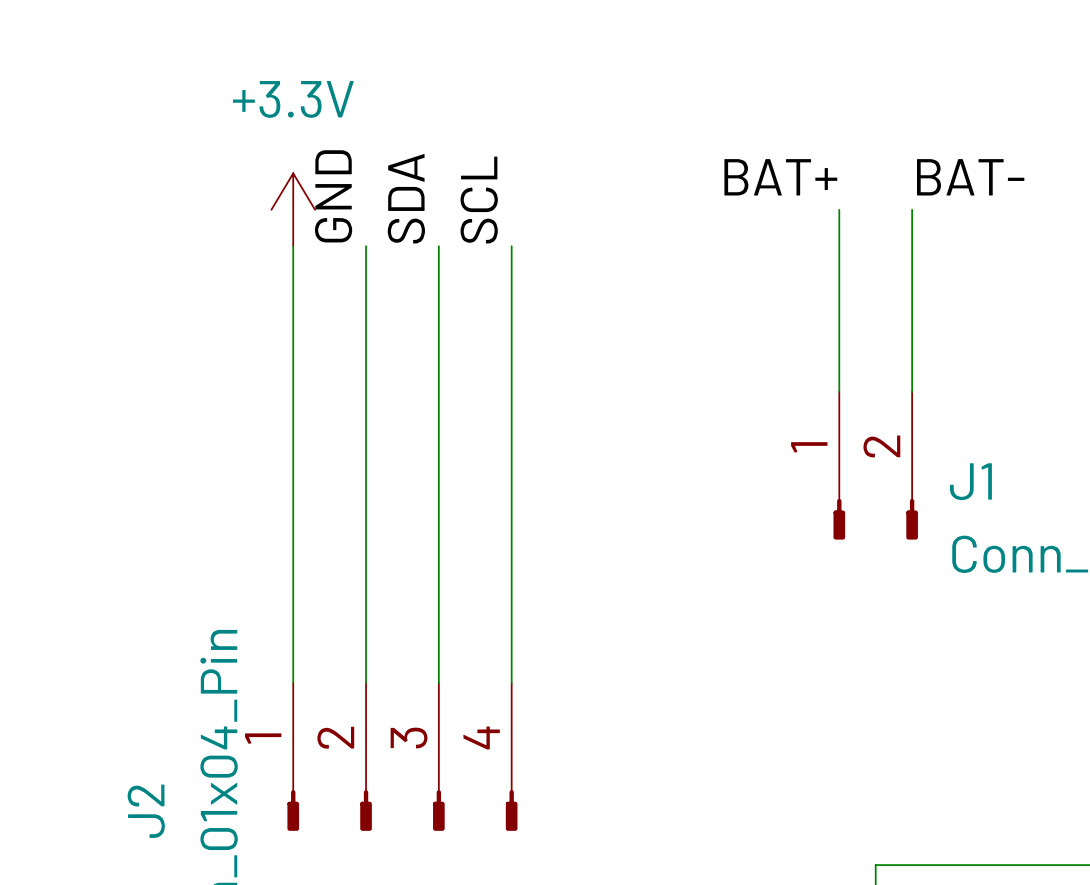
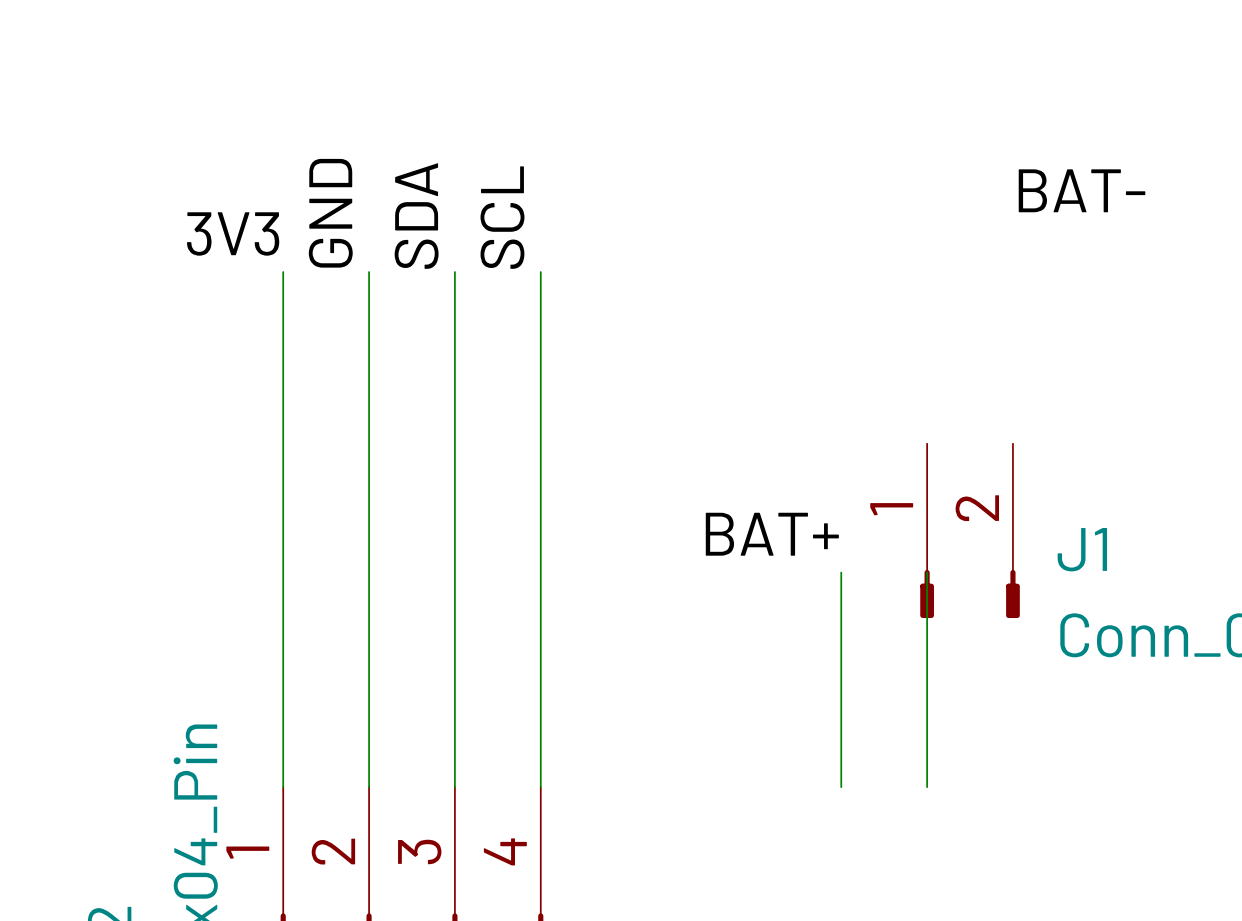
label position: BAT+ (780, 177) -> BAT+ (772, 534)
power symbol: +3.3V (293, 209) -> none
wire: (839, 209) (839, 391) -> (841, 572) (841, 787)
wire: (912, 209) (912, 391) -> (927, 572) (927, 787)
label: none -> 3V3 (233, 233)

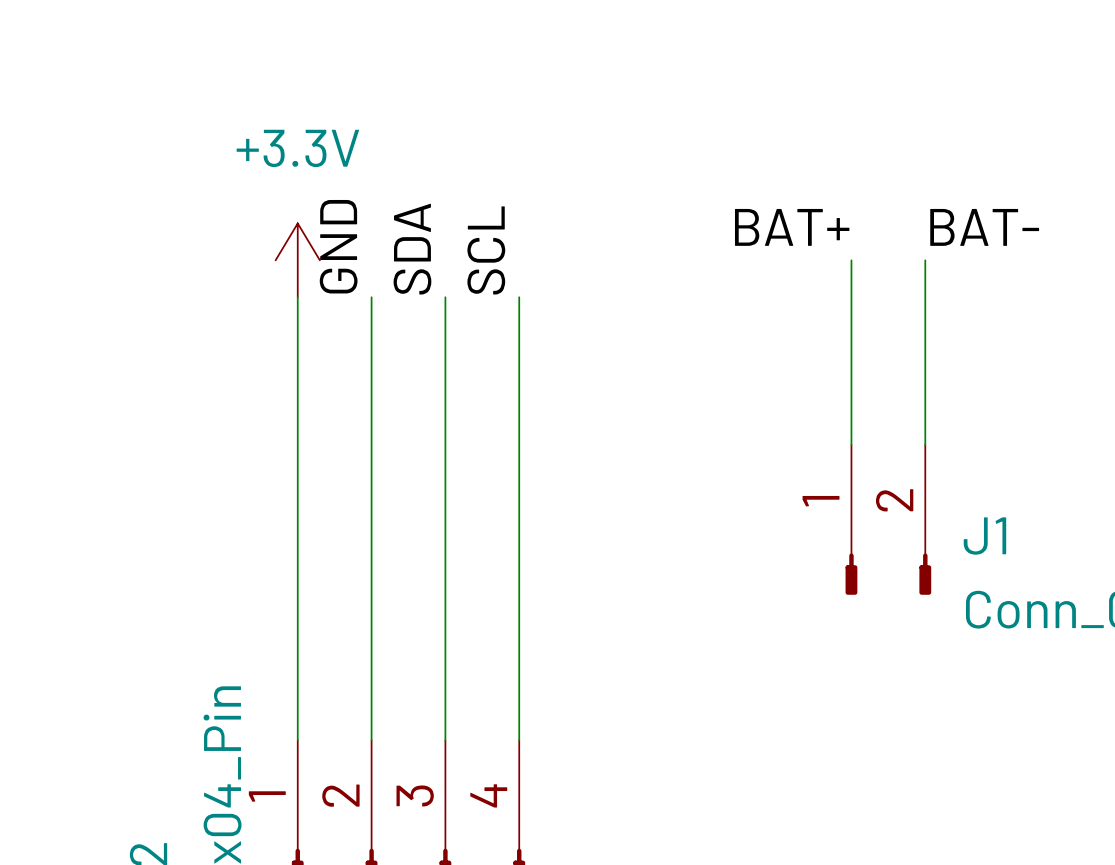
power symbol: none -> +3.3V (297, 260)
label: 3V3 (233, 233) -> none
label position: BAT+ (772, 534) -> BAT+ (792, 227)
wire: (841, 572) (841, 787) -> (851, 260) (851, 444)
wire: (927, 572) (927, 787) -> (925, 260) (925, 444)

